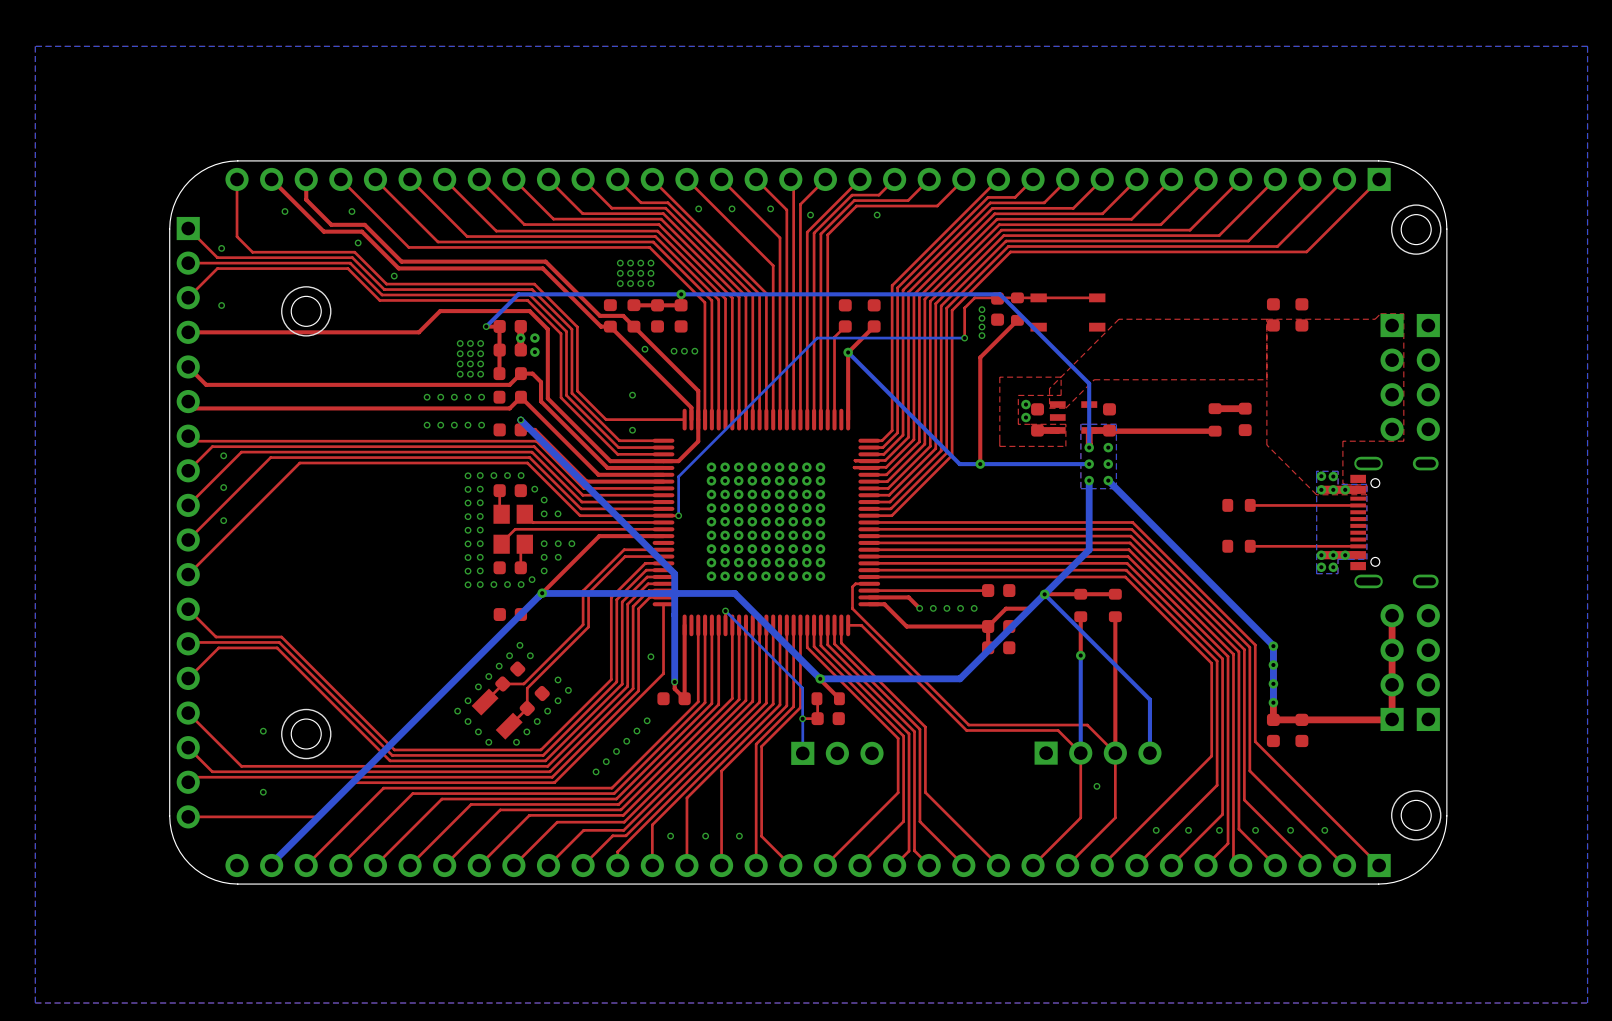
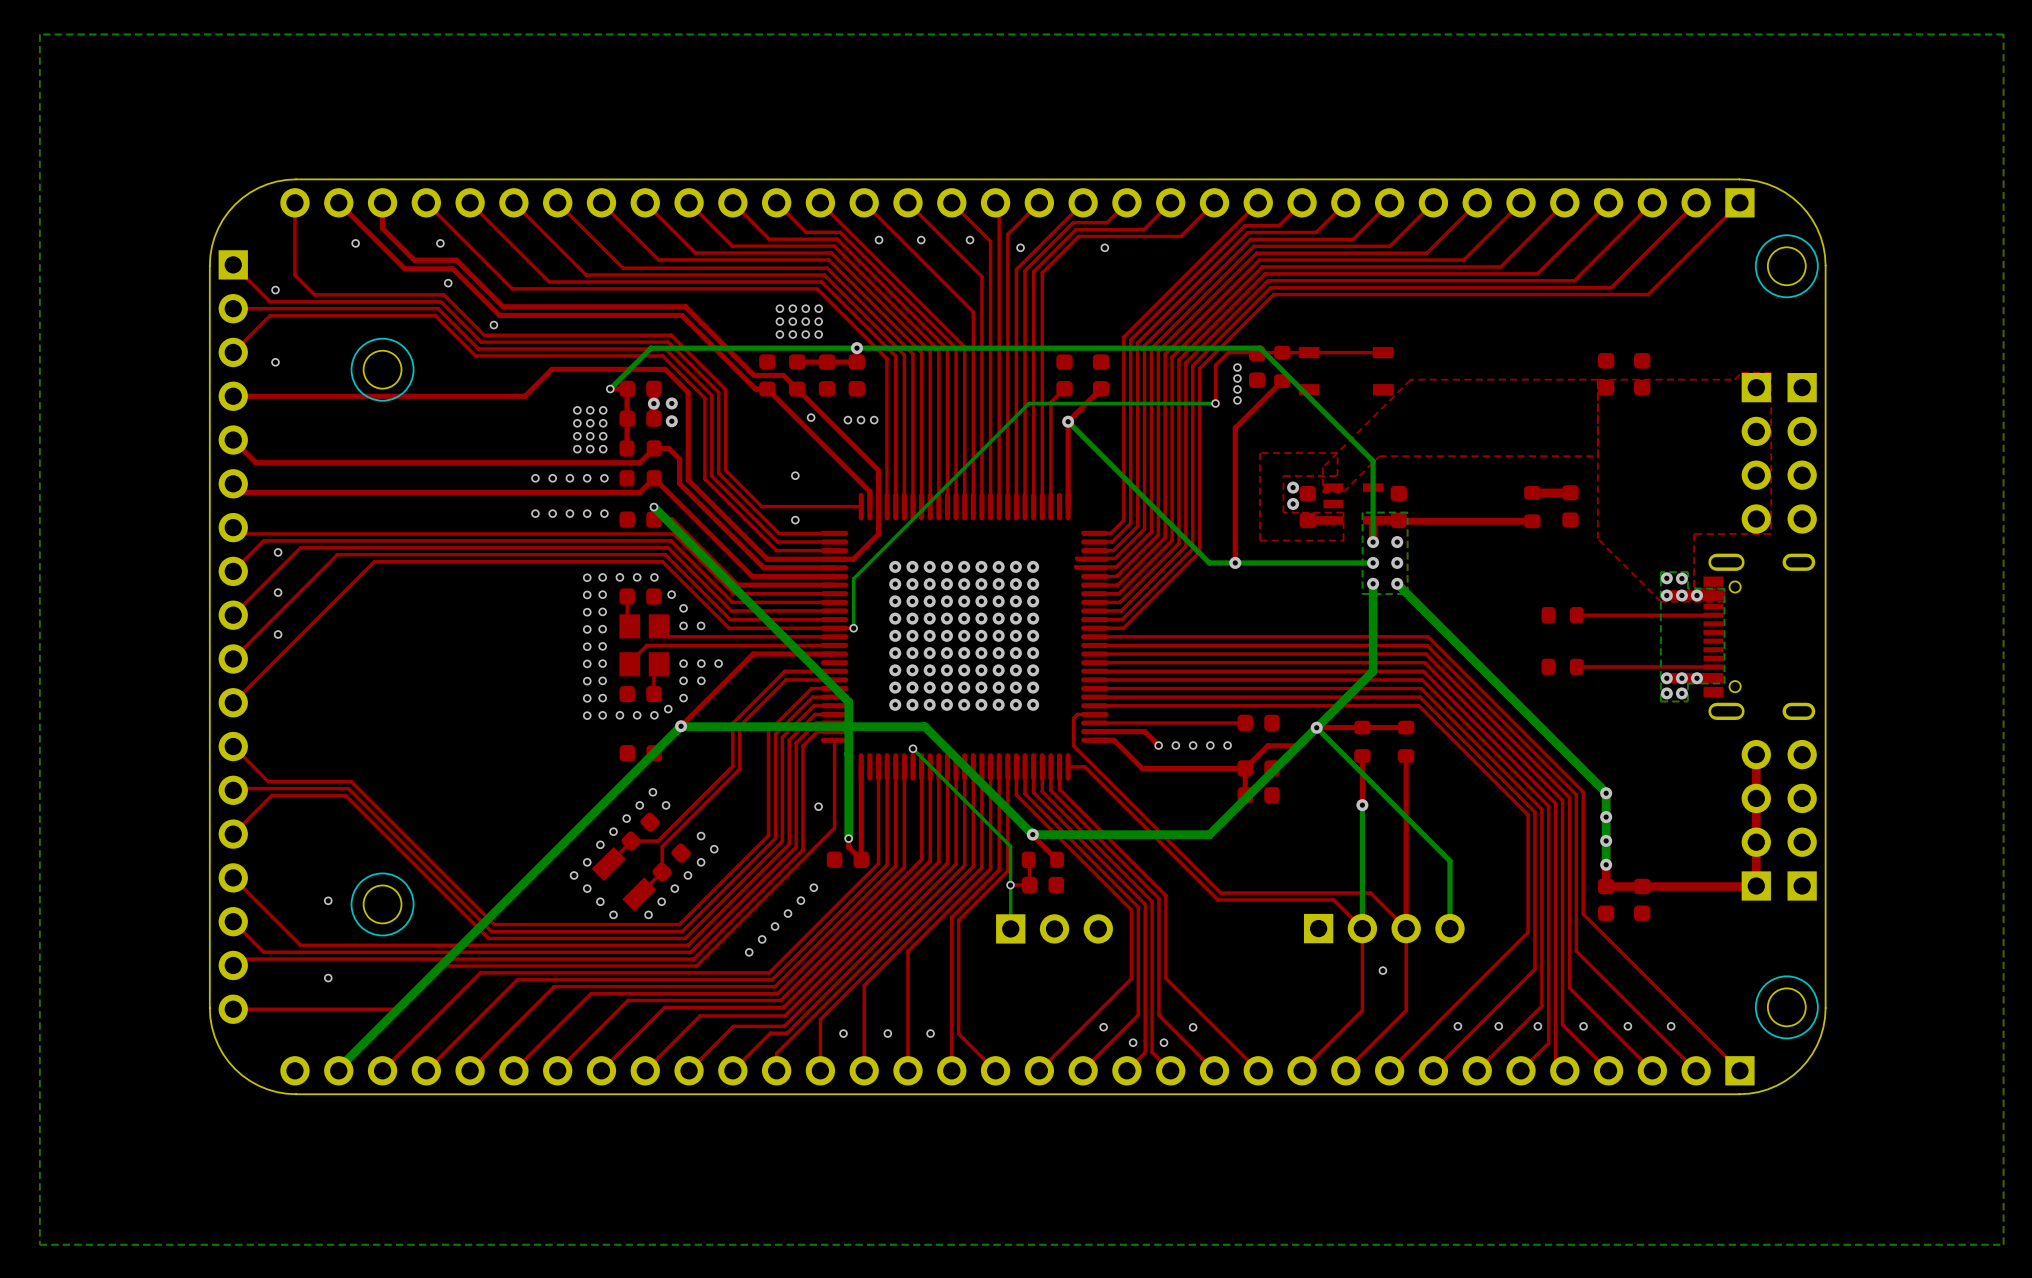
via: none -> (1103, 1027)
via: none -> (1193, 1027)
via: none -> (1133, 1042)
via: none -> (1163, 1042)

